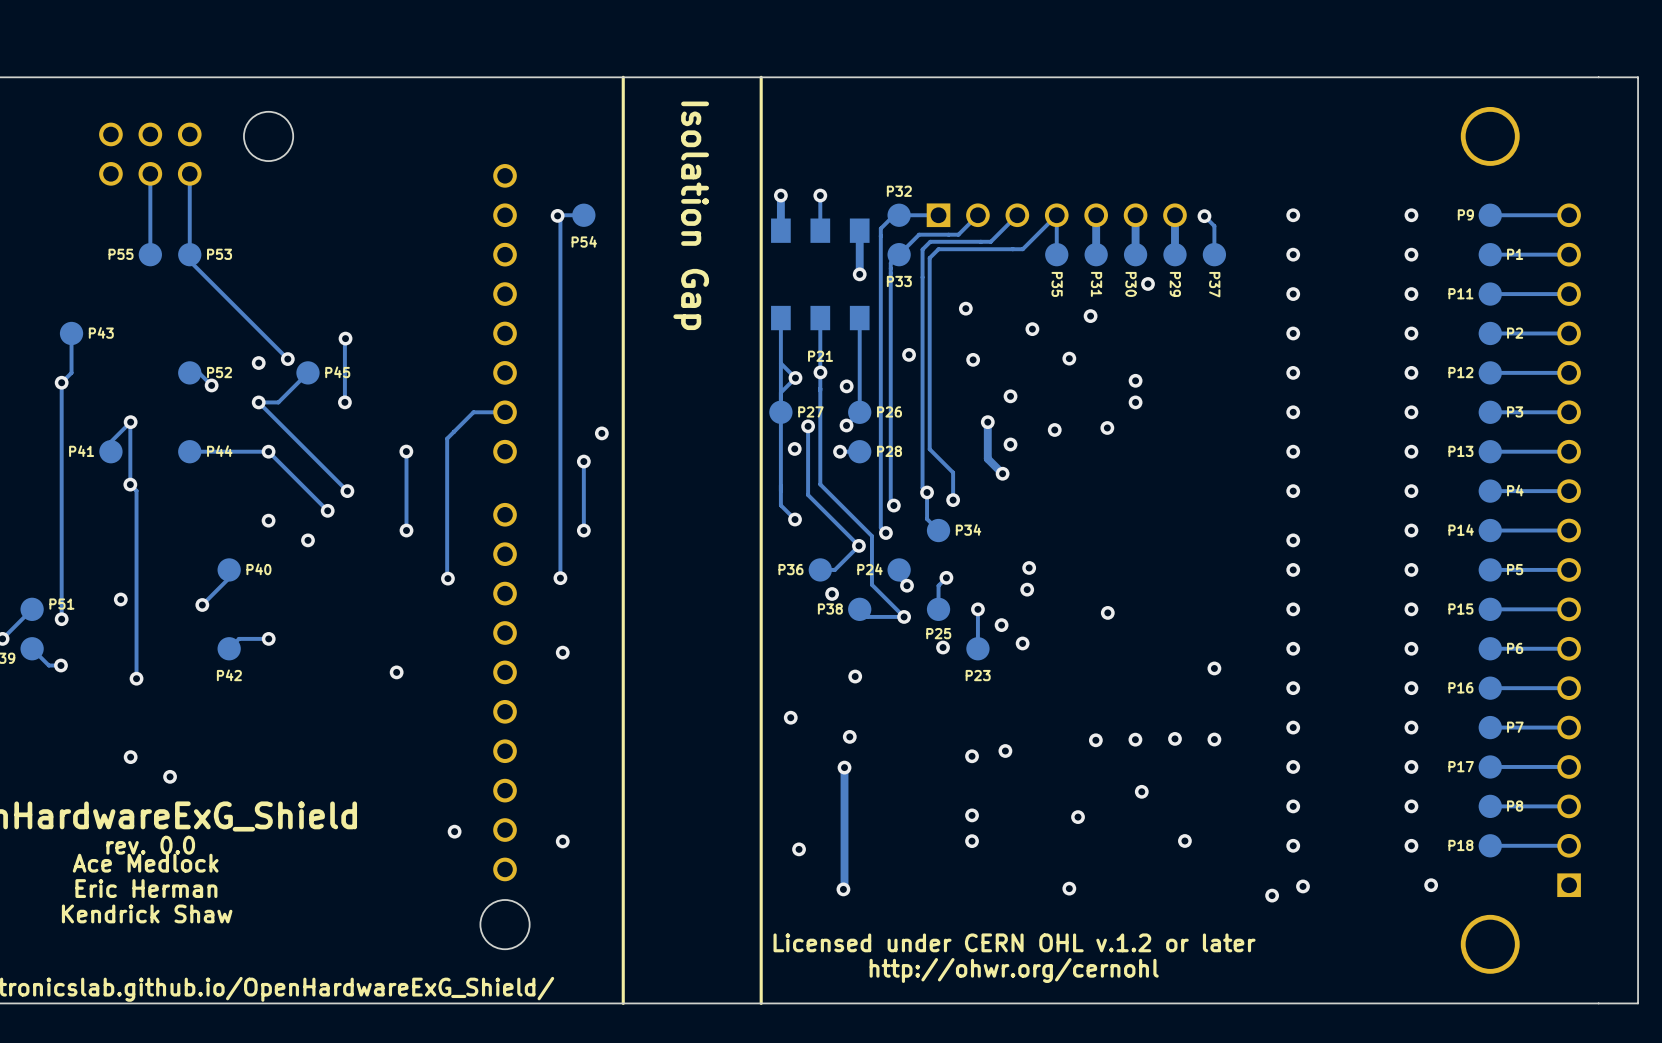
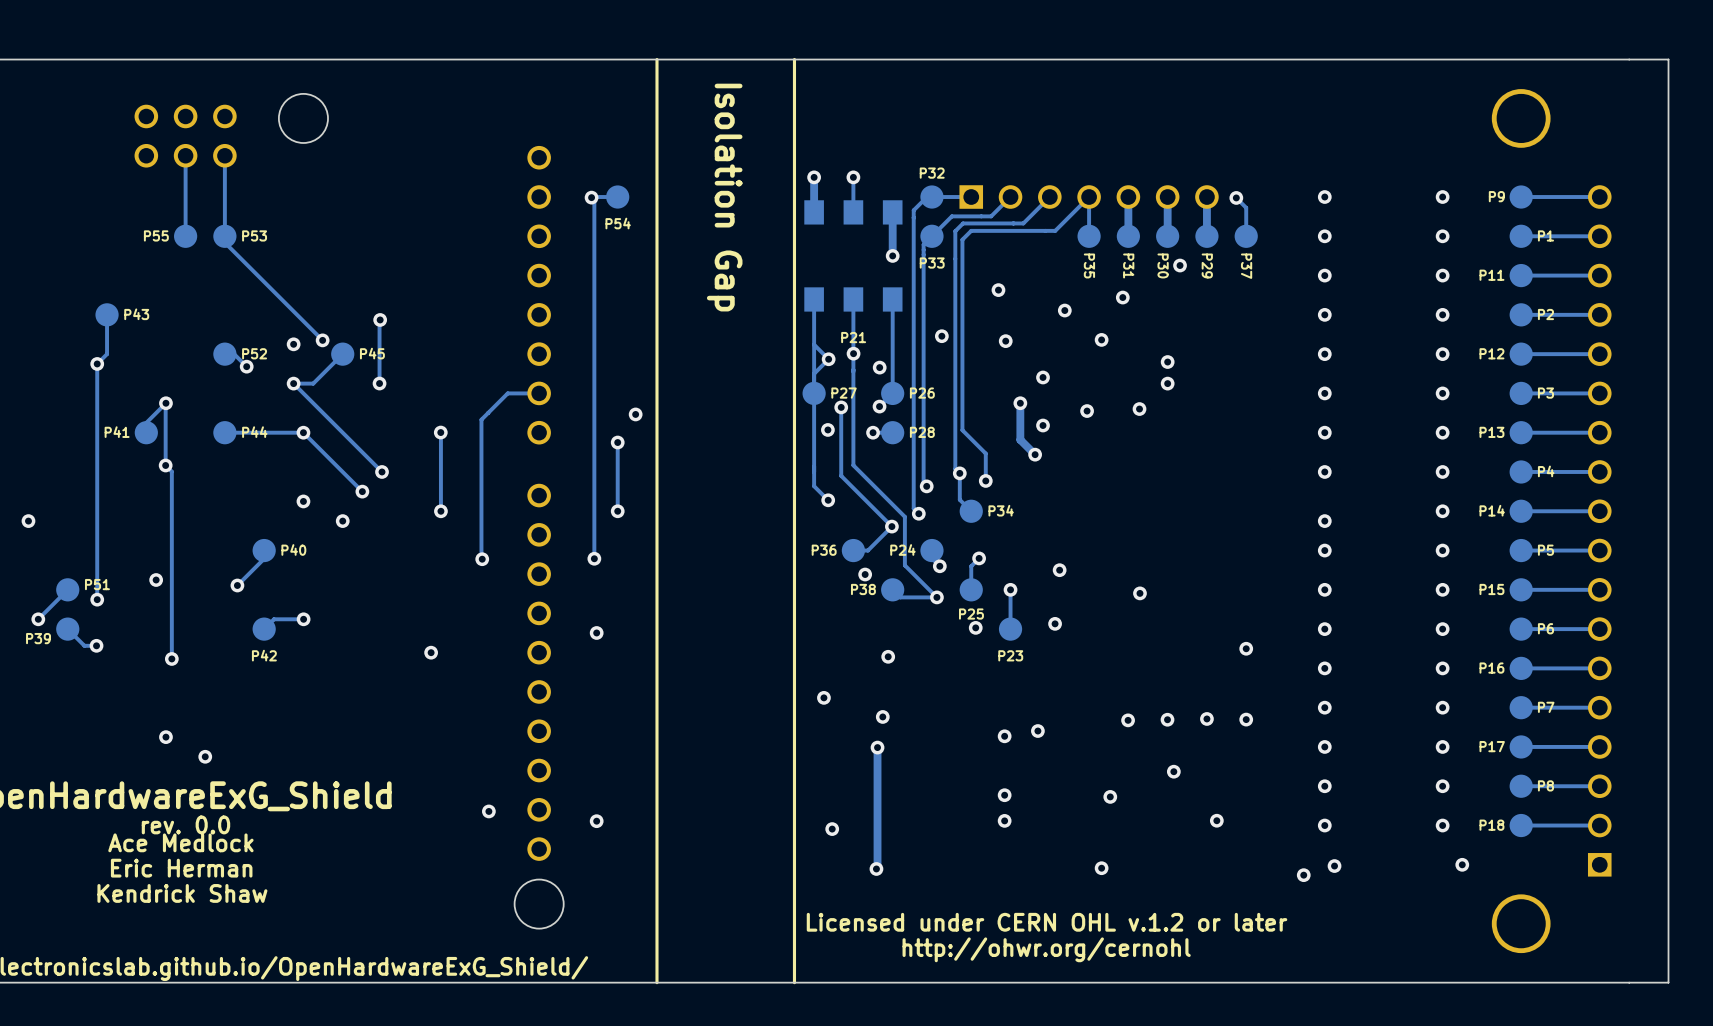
via: (1029, 567) -> none
via: (1001, 625) -> none

